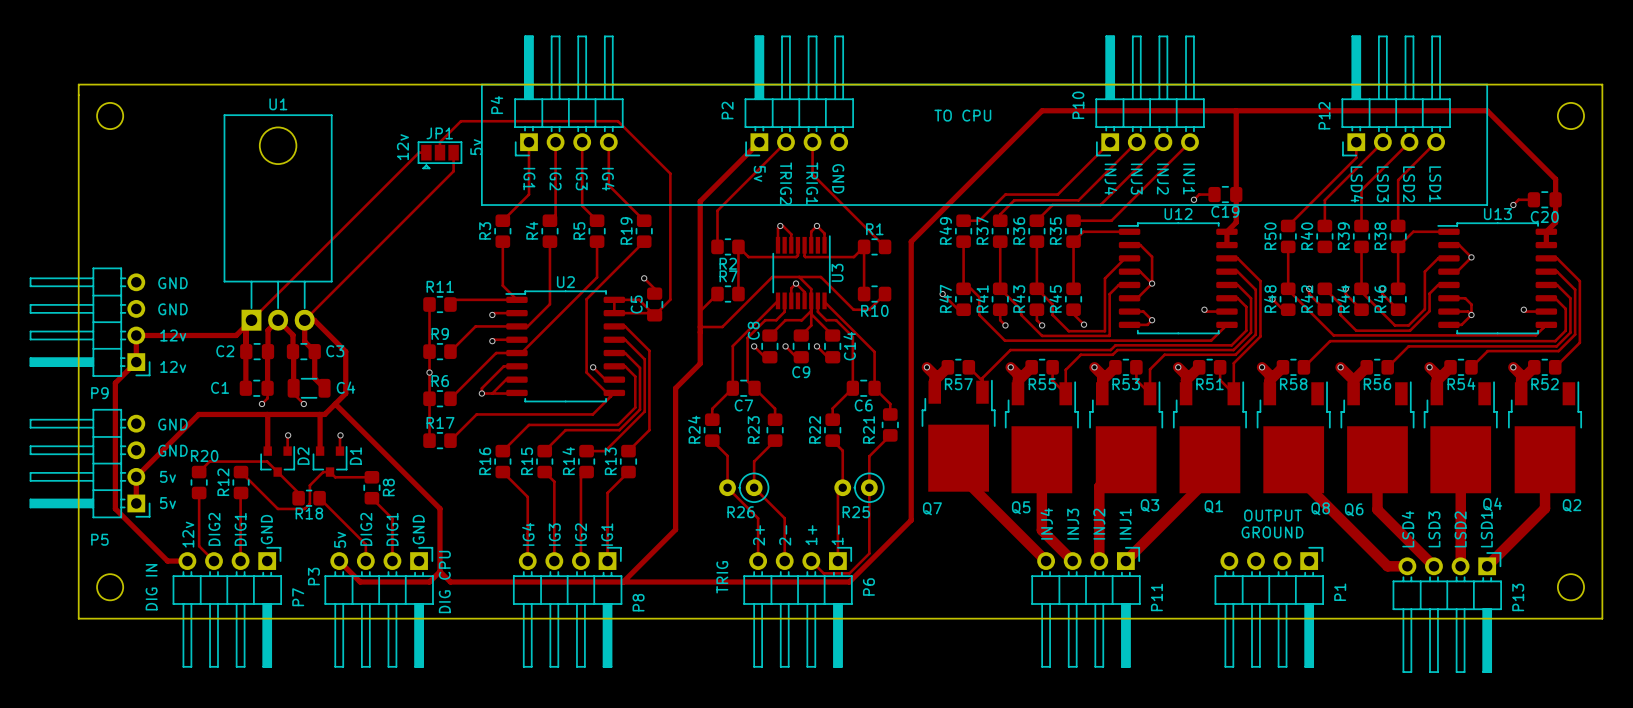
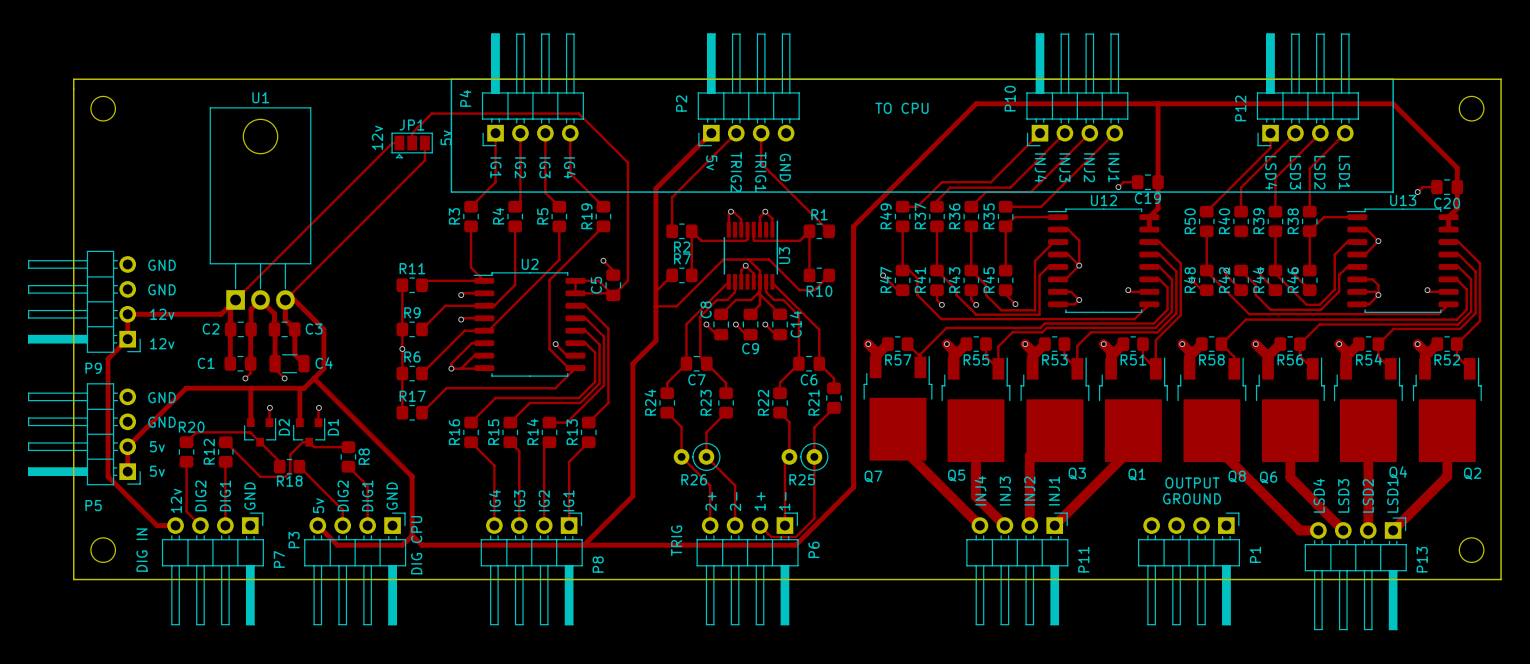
track: none -> (1221, 344) (1234, 356) (1234, 368)
track: none -> (1299, 344) (1299, 356) (1312, 368)
track: none -> (1378, 344) (1378, 356) (1390, 368)
track: none -> (1456, 344) (1456, 356) (1469, 368)

